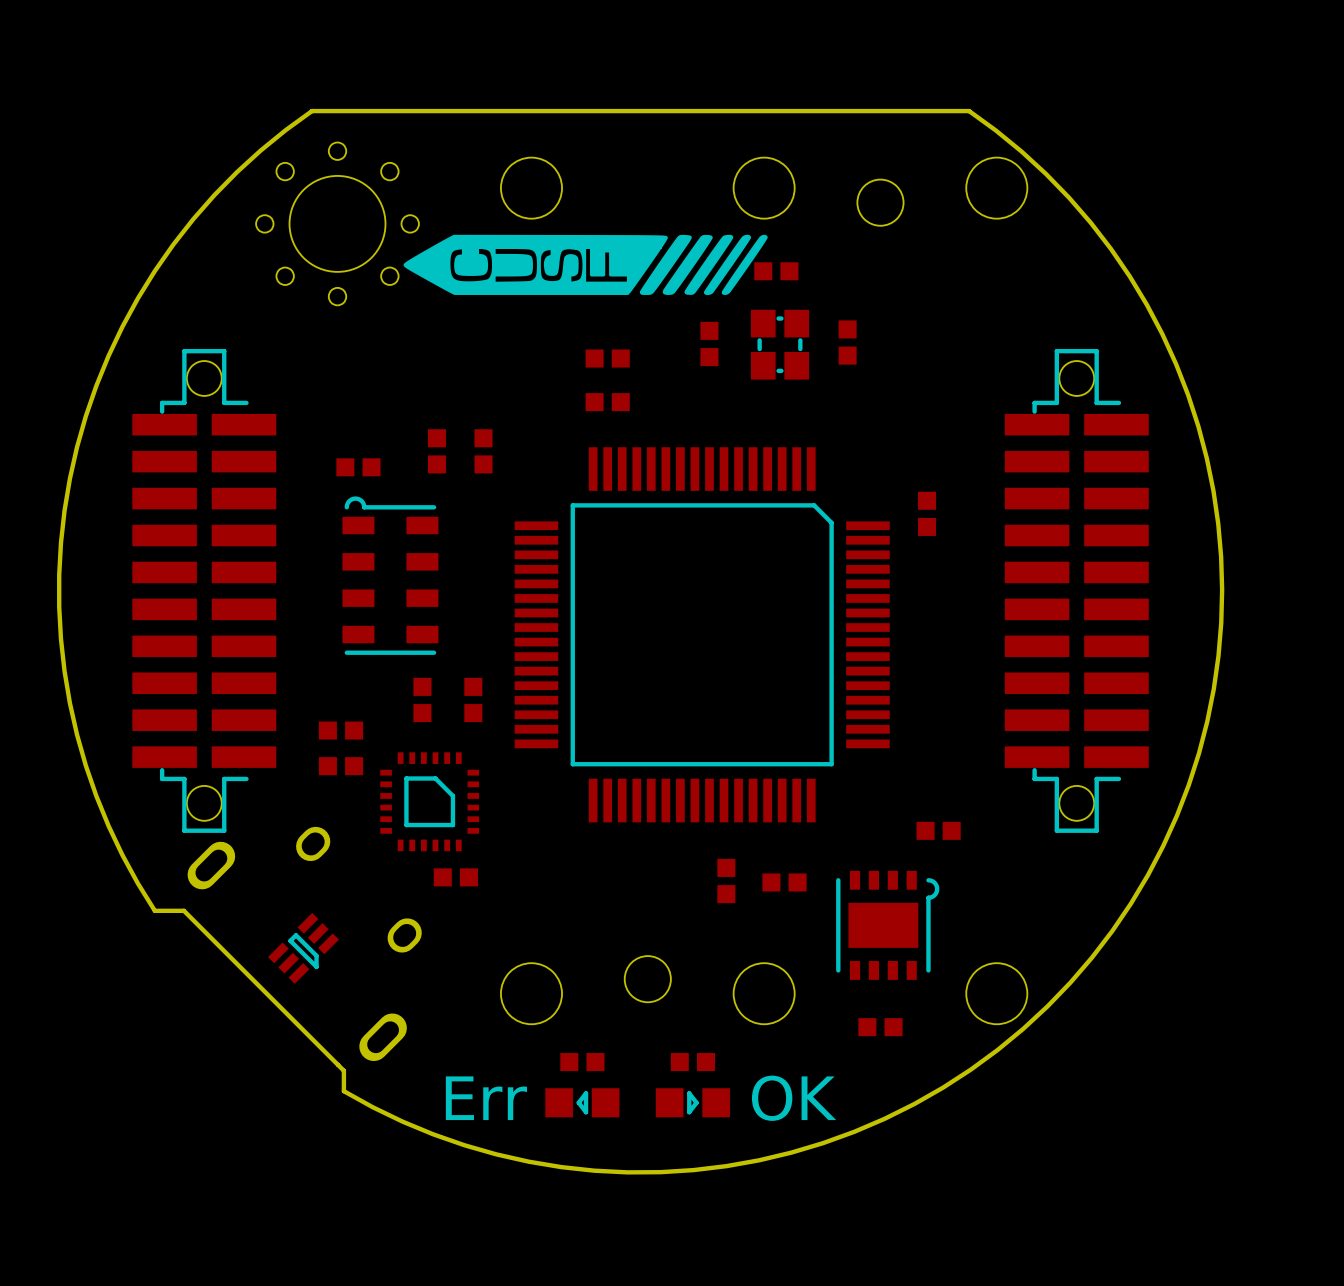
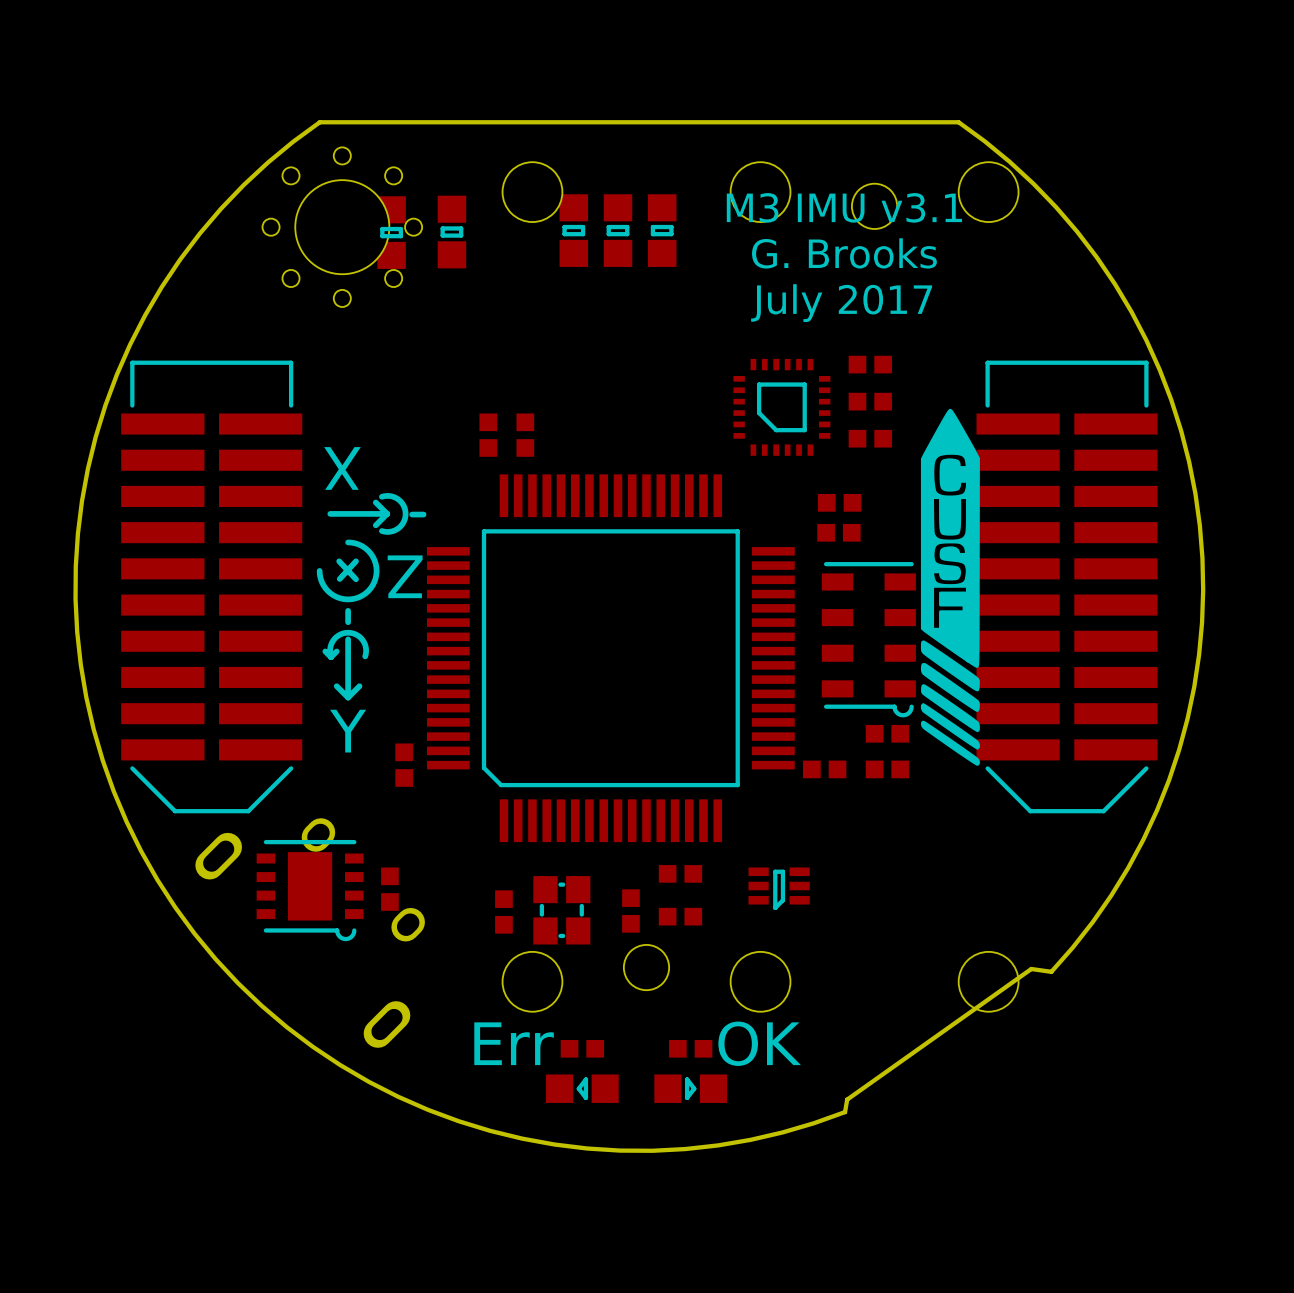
board edge: (311, 111) (969, 111) (1021, 151) (1045, 173) (1069, 197) (1111, 248) (1146, 304) (1176, 364) (1188, 394) (1206, 458) (1213, 490) (1221, 556) (1221, 622) (1213, 688) (1207, 721) (1188, 784) (1163, 845) (1130, 903) (1092, 957) (1047, 1006) (1023, 1028) (970, 1069) (914, 1104) (854, 1131) (791, 1152) (759, 1160) (693, 1170) (627, 1172) (594, 1170) (528, 1161) (496, 1154) (433, 1134) (372, 1107) (343, 1091) (343, 1070) (183, 910) (154, 910) (122, 855) (108, 825) (85, 765) (69, 703) (60, 639) (59, 607) (60, 542) (69, 478) (85, 416) (108, 355) (122, 326) (154, 271) (193, 219) (214, 195) (260, 150) (285, 129) (312, 110) -> (319, 122) (958, 122) (1009, 161) (1055, 207) (1077, 231) (1114, 283) (1146, 340) (1171, 399) (1181, 430) (1195, 493) (1199, 525) (1203, 590) (1199, 654) (1194, 686) (1187, 718) (1169, 780) (1157, 810) (1128, 868) (1092, 922) (1051, 971) (1031, 968) (847, 1099) (845, 1112) (814, 1123) (750, 1139) (685, 1149) (619, 1150) (554, 1144) (490, 1130) (428, 1109) (398, 1096) (340, 1065) (286, 1027) (238, 983) (215, 959) (175, 907) (141, 851) (113, 791) (93, 729) (80, 664) (77, 632) (75, 566) (81, 501) (87, 468) (105, 405) (130, 344) (161, 287) (179, 259) (221, 208) (267, 162) (319, 122)
text: none -> M3 IMU v3.1 (844, 207)
part: none -> (573, 230)
part: none -> (617, 230)
part: none -> (662, 230)
part: none -> (451, 232)
part: none -> (391, 232)
drawing: [403, 234, 768, 296] -> none
text: none -> G. Brooks (844, 253)
part: (776, 271) -> none
text: none -> July 2017 (841, 303)
part: (847, 342) -> none
part: (709, 343) -> none
part position: (779, 344) -> (561, 910)
part footprint: [132, 348, 277, 833] -> [121, 360, 303, 814]
part footprint: [1004, 348, 1149, 833] -> [976, 360, 1158, 814]
part: (607, 358) -> none
part: none -> (870, 364)
part: none -> (870, 401)
part: (607, 402) -> none
drawing: none -> [920, 408, 980, 766]
part: none -> (525, 435)
part: none -> (870, 438)
part: (436, 451) -> none
part position: (483, 451) -> (488, 435)
part: (358, 467) -> none
text: none -> X (342, 468)
line: none -> (381, 496) (390, 496) (399, 499) (403, 505) (405, 513) (403, 522) (397, 529) (388, 531) (381, 531)
line: none -> (375, 502) (387, 513) (375, 525)
part: none -> (839, 502)
part: (927, 513) -> none
line: none -> (330, 513) (387, 513)
line: none -> (412, 514) (423, 514)
part: none -> (838, 532)
line: none -> (348, 542) (365, 548) (374, 560) (375, 578) (368, 591) (355, 598) (337, 597) (325, 588) (319, 570)
line: none -> (339, 561) (356, 579)
line: none -> (356, 561) (339, 578)
part rotation: 0° (390, 575) -> 180° (868, 639)
part position: (390, 575) -> (868, 639)
text: none -> Z (405, 576)
line: none -> (348, 610) (348, 622)
part rotation: 0° (702, 634) -> 180° (610, 658)
line: none -> (348, 639) (348, 696)
line: none -> (325, 651) (331, 657) (336, 651)
line: none -> (331, 656) (330, 647) (334, 639) (339, 634) (348, 632) (356, 634) (363, 641) (366, 649) (365, 656)
line: none -> (336, 686) (348, 697) (359, 686)
part: (422, 699) -> none
part: (473, 699) -> none
part: (341, 730) -> none
text: none -> Y (348, 731)
part: none -> (887, 733)
part: (341, 766) -> none
part: none -> (404, 765)
part: none -> (824, 769)
part: none -> (887, 769)
part rotation: 0° (429, 801) -> 180° (781, 407)
part position: (429, 801) -> (781, 407)
part: (938, 830) -> none
part footprint: [762, 873, 807, 892] -> [748, 867, 810, 911]
part: (455, 877) -> none
part: (726, 881) -> none
part: none -> (680, 873)
part: none -> (389, 889)
part: none -> (630, 911)
part: none -> (503, 911)
part rotation: 0° (887, 925) -> 90° clockwise (310, 890)
part position: (887, 925) -> (310, 890)
part: none -> (680, 916)
part: (303, 948) -> none
part: (880, 1027) -> none
text position: Err (486, 1098) -> Err (514, 1043)
text position: OK (794, 1098) -> OK (759, 1043)

